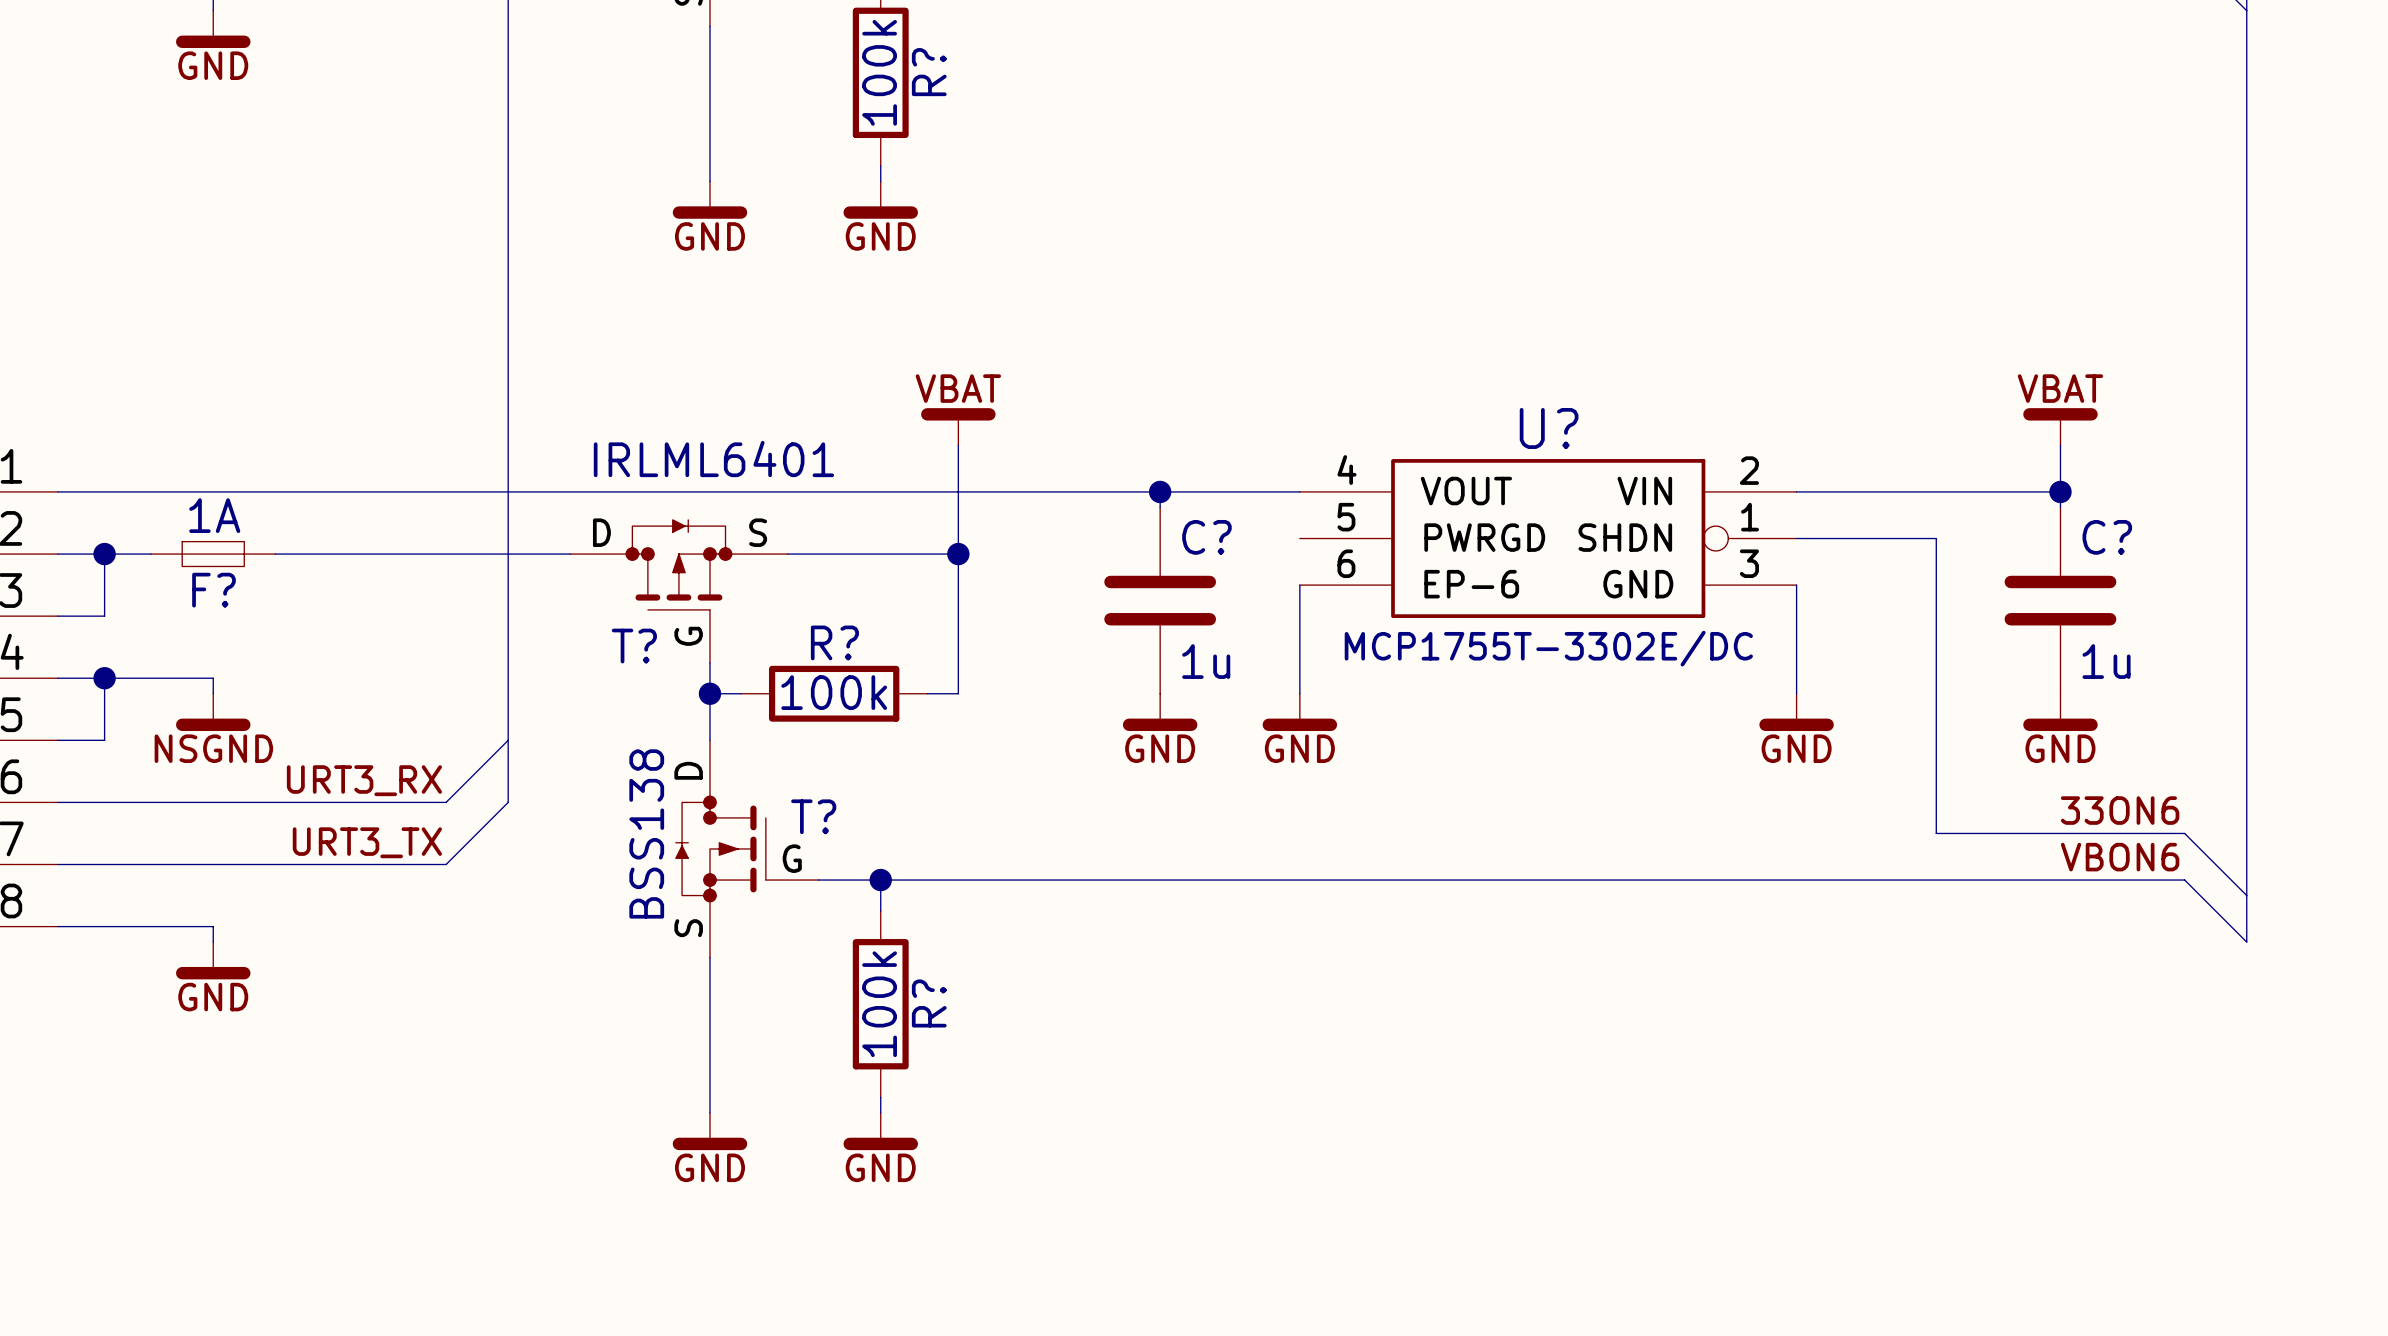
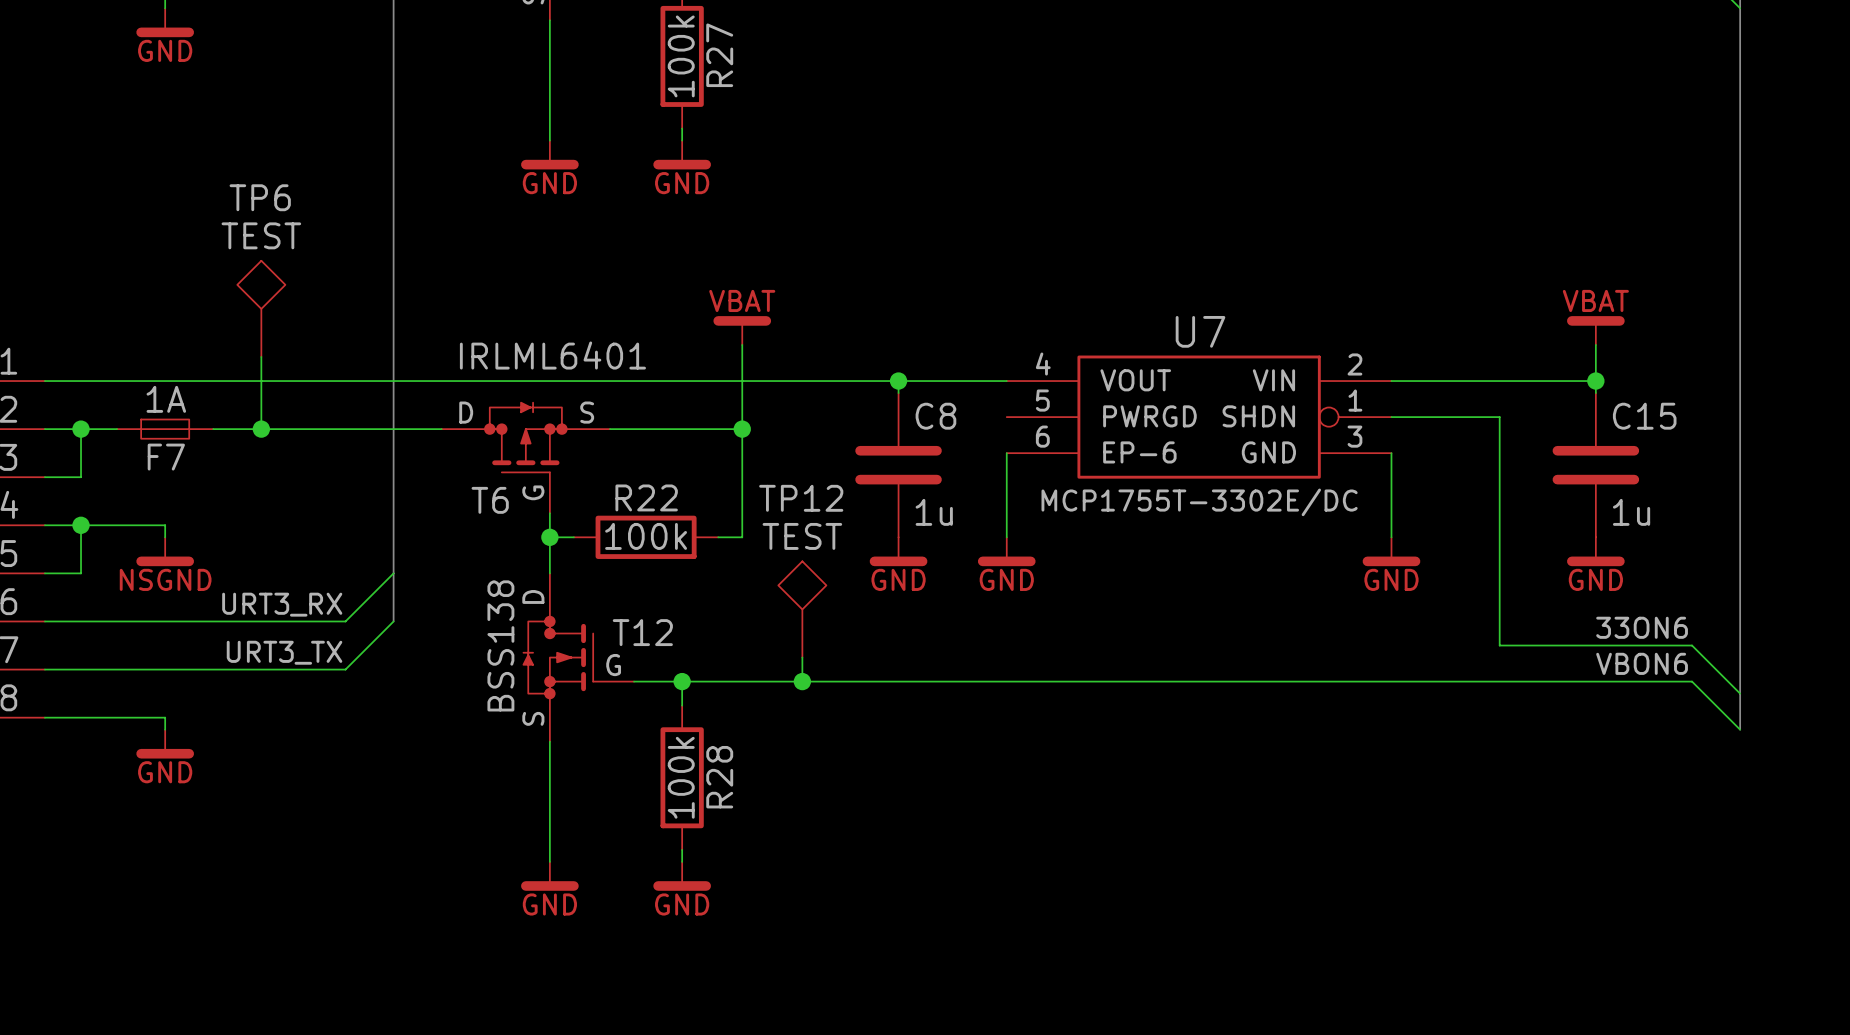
R? name: R? (929, 72) -> R27 (719, 55)
TP6: none -> TEST (261, 308)
U? name: U? (1549, 428) -> U7 (1200, 331)
wire: none -> (261, 356) (261, 429)
C? name: C? (1206, 537) -> C8 (935, 416)
C? name: C? (2107, 537) -> C15 (1644, 416)
junction: none -> (261, 429)
F? name: F? (213, 590) -> F7 (166, 457)
R? name: R? (834, 642) -> R22 (646, 497)
T? name: T? (634, 646) -> T6 (490, 500)
TP12: none -> TEST (802, 609)
T? name: T? (813, 816) -> T12 (642, 632)
wire: none -> (802, 657) (802, 681)
junction: none -> (802, 681)
R? name: R? (929, 1003) -> R28 (719, 777)

